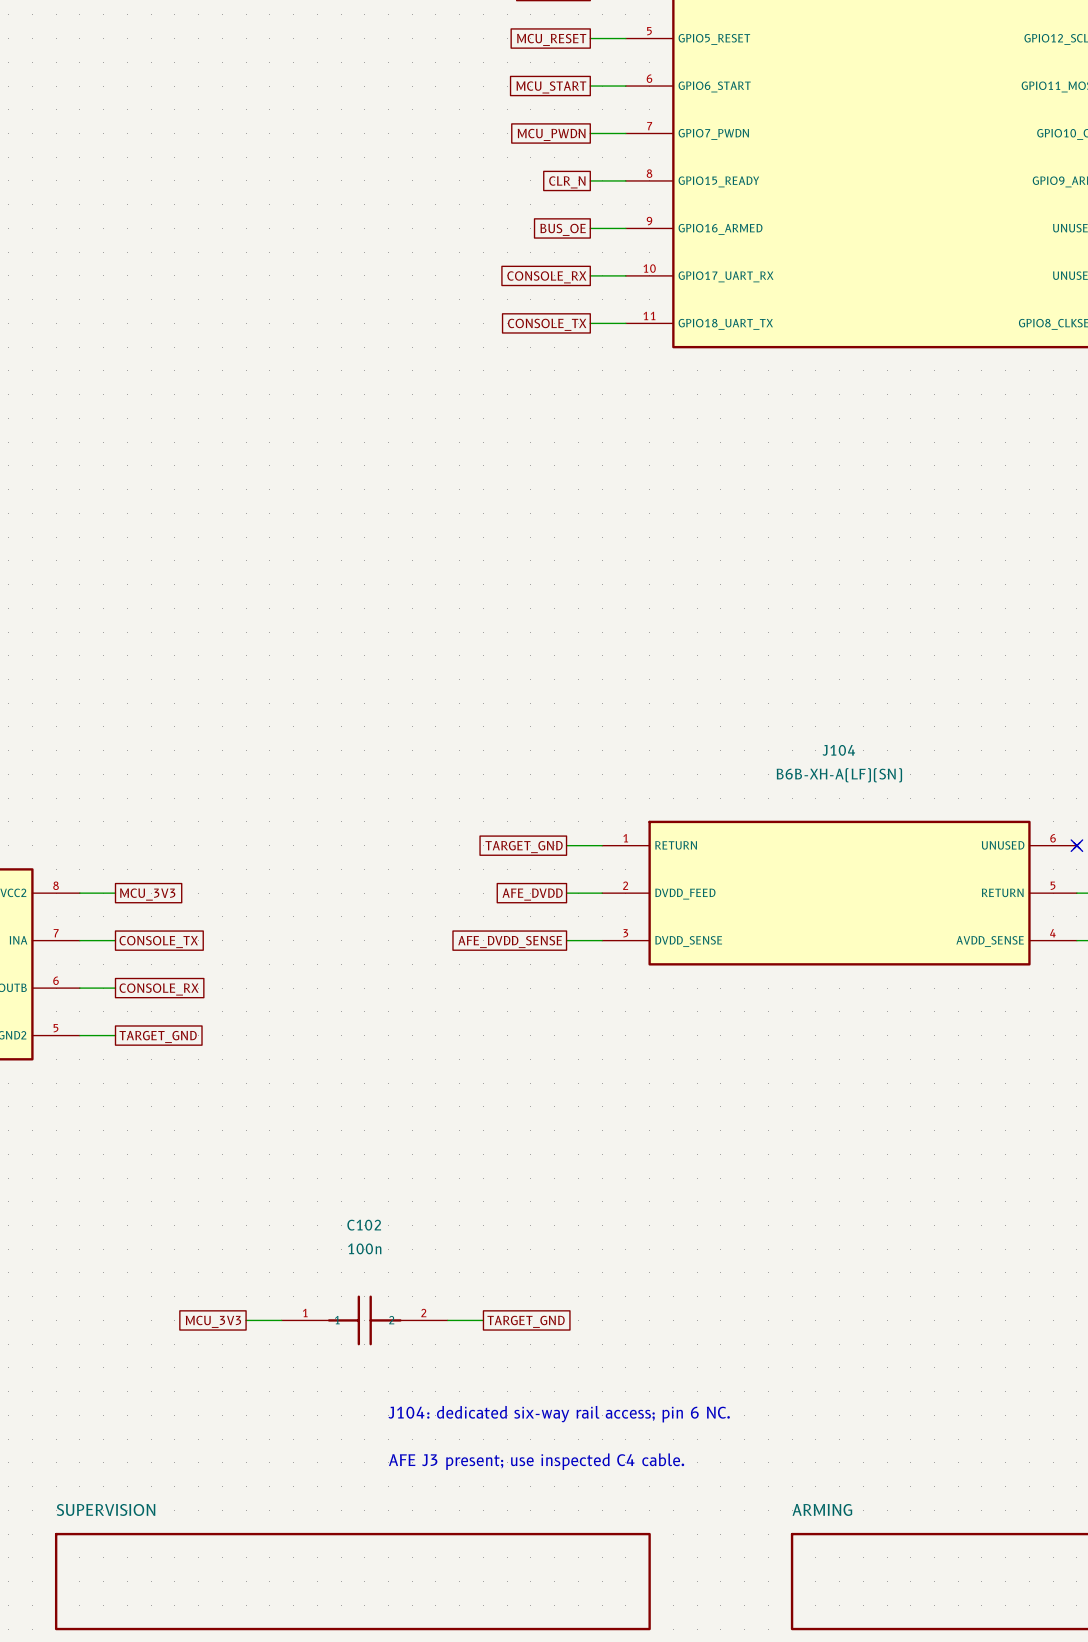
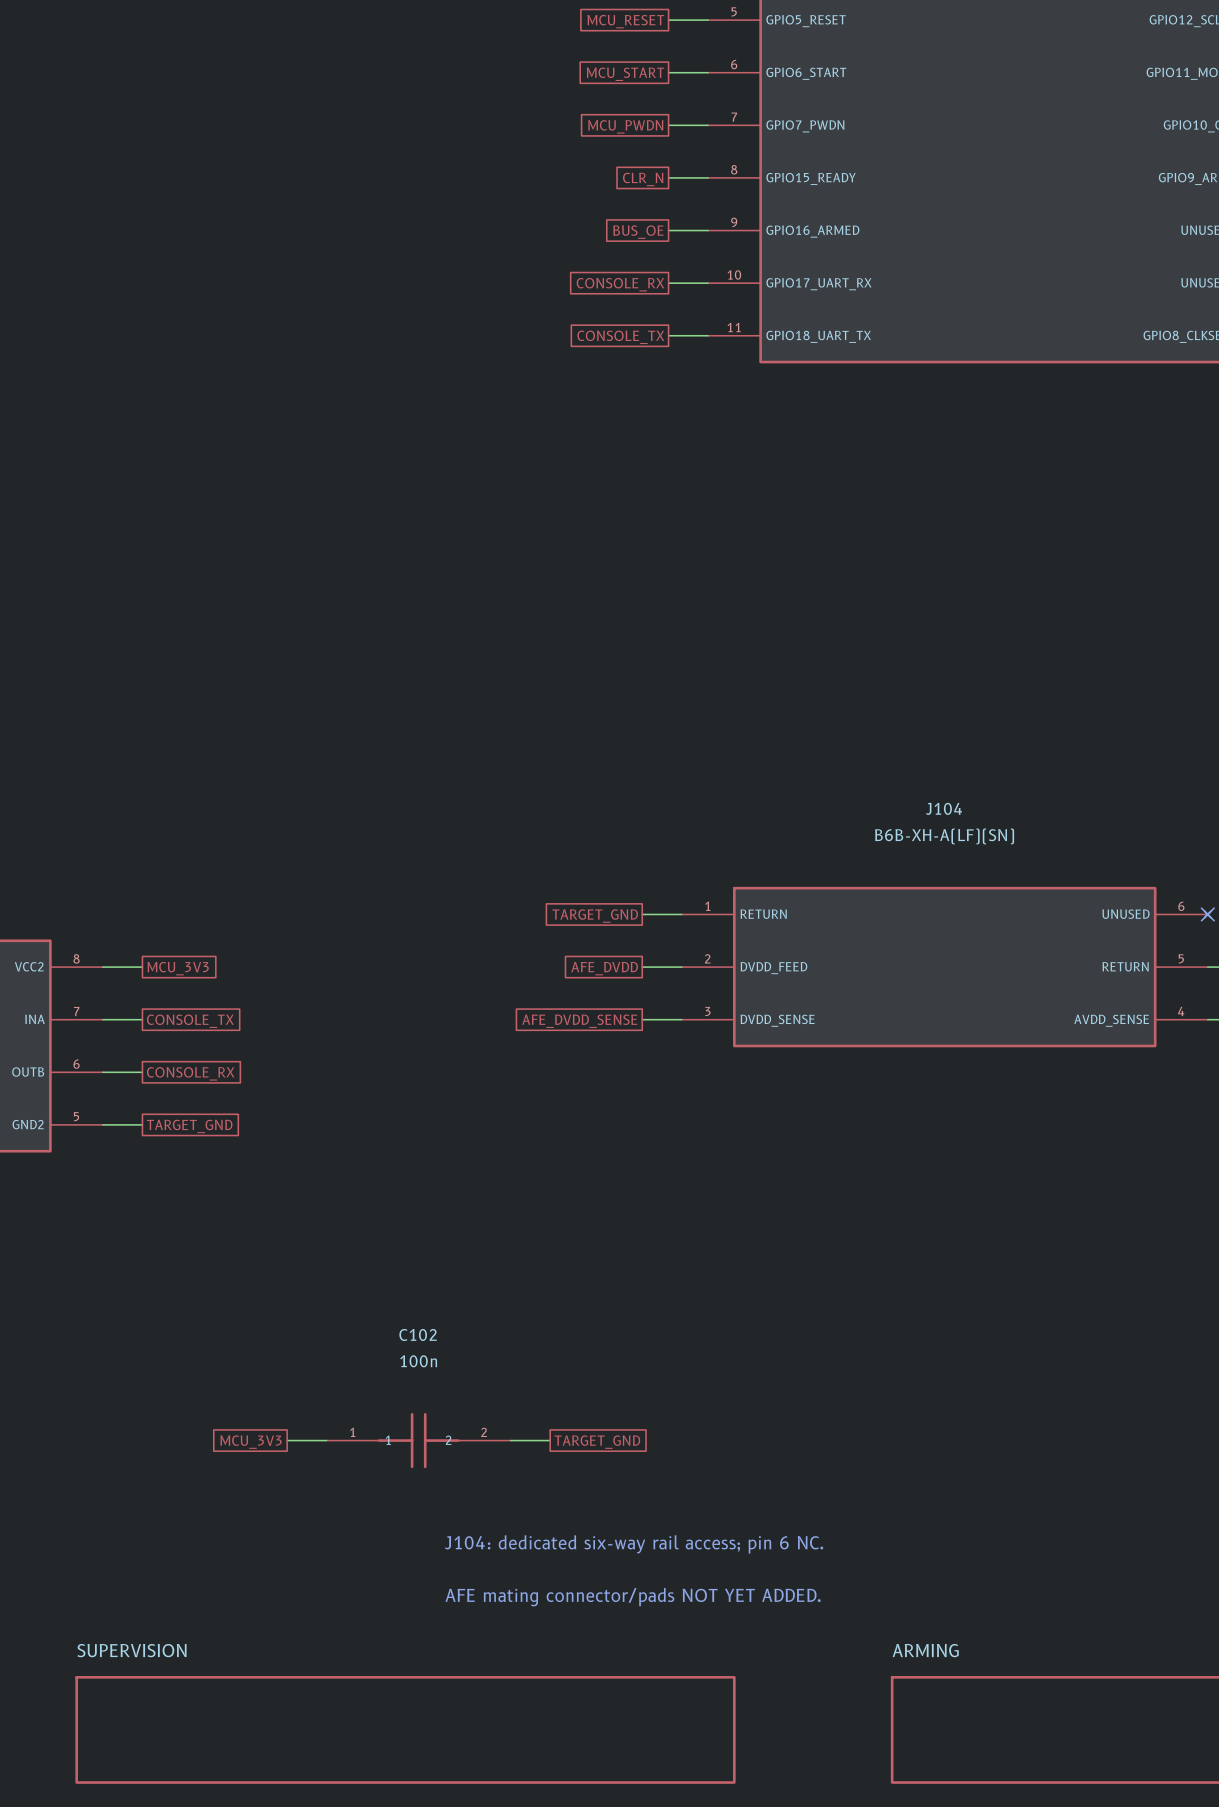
text: AFE J3 present; use inspected C4 cable. (536, 1461) -> AFE mating connector/pads NOT YET ADDED. (633, 1597)

